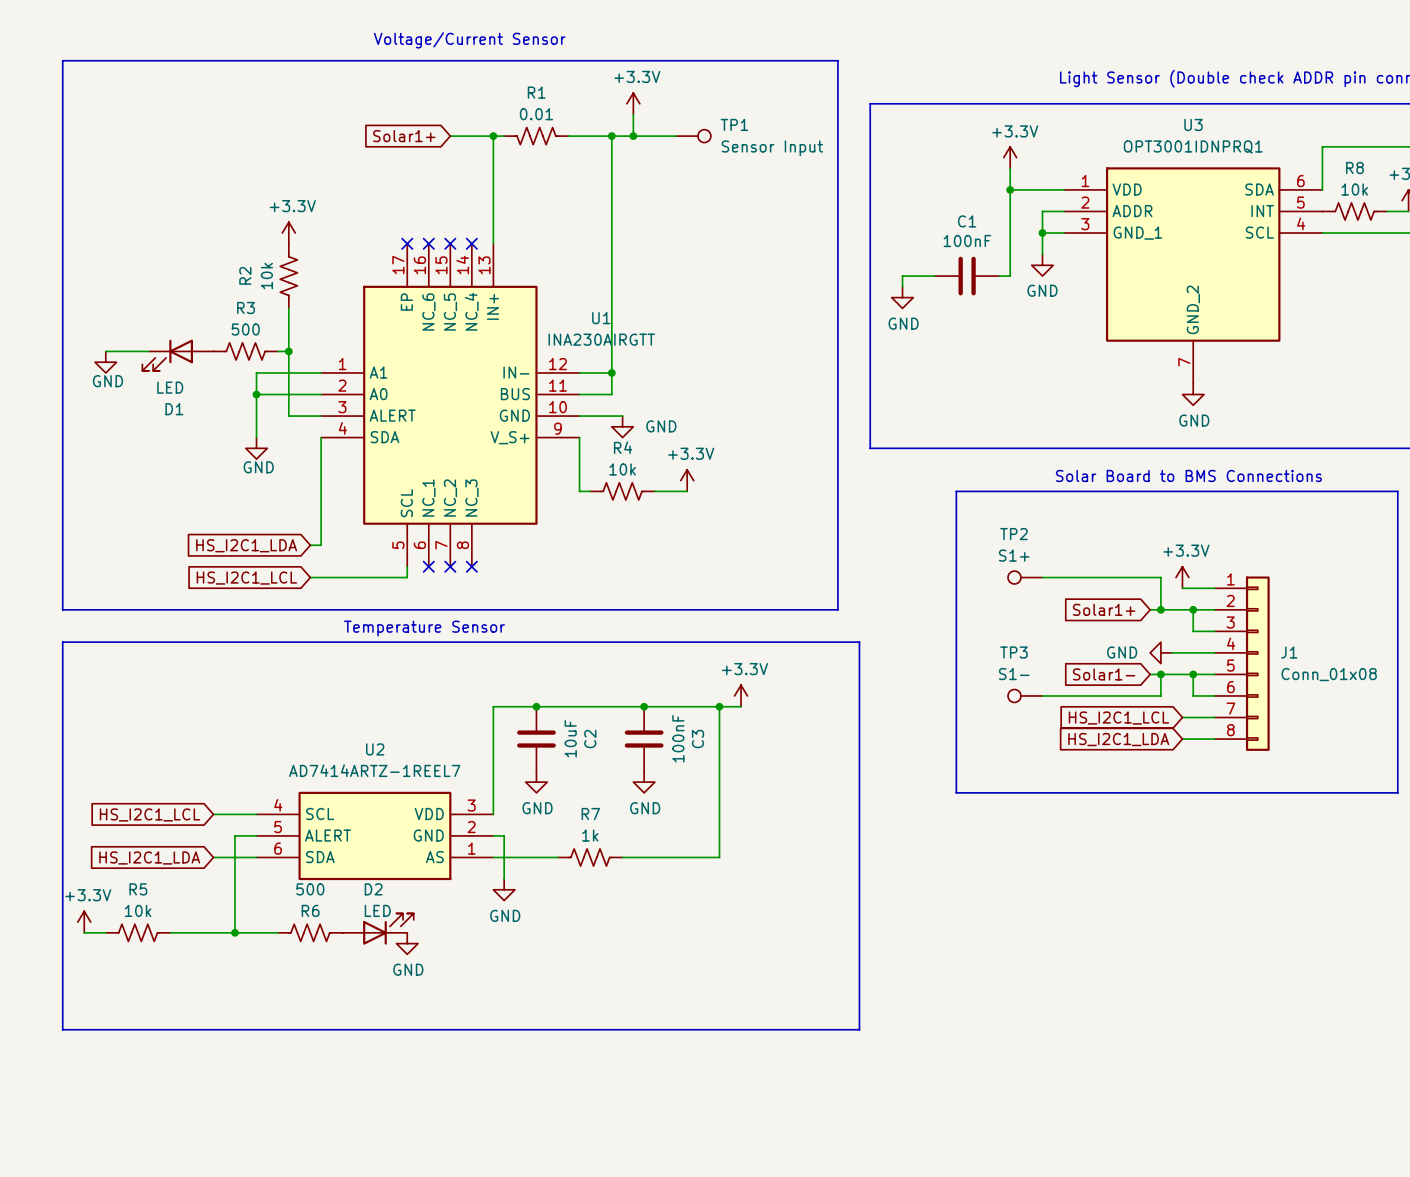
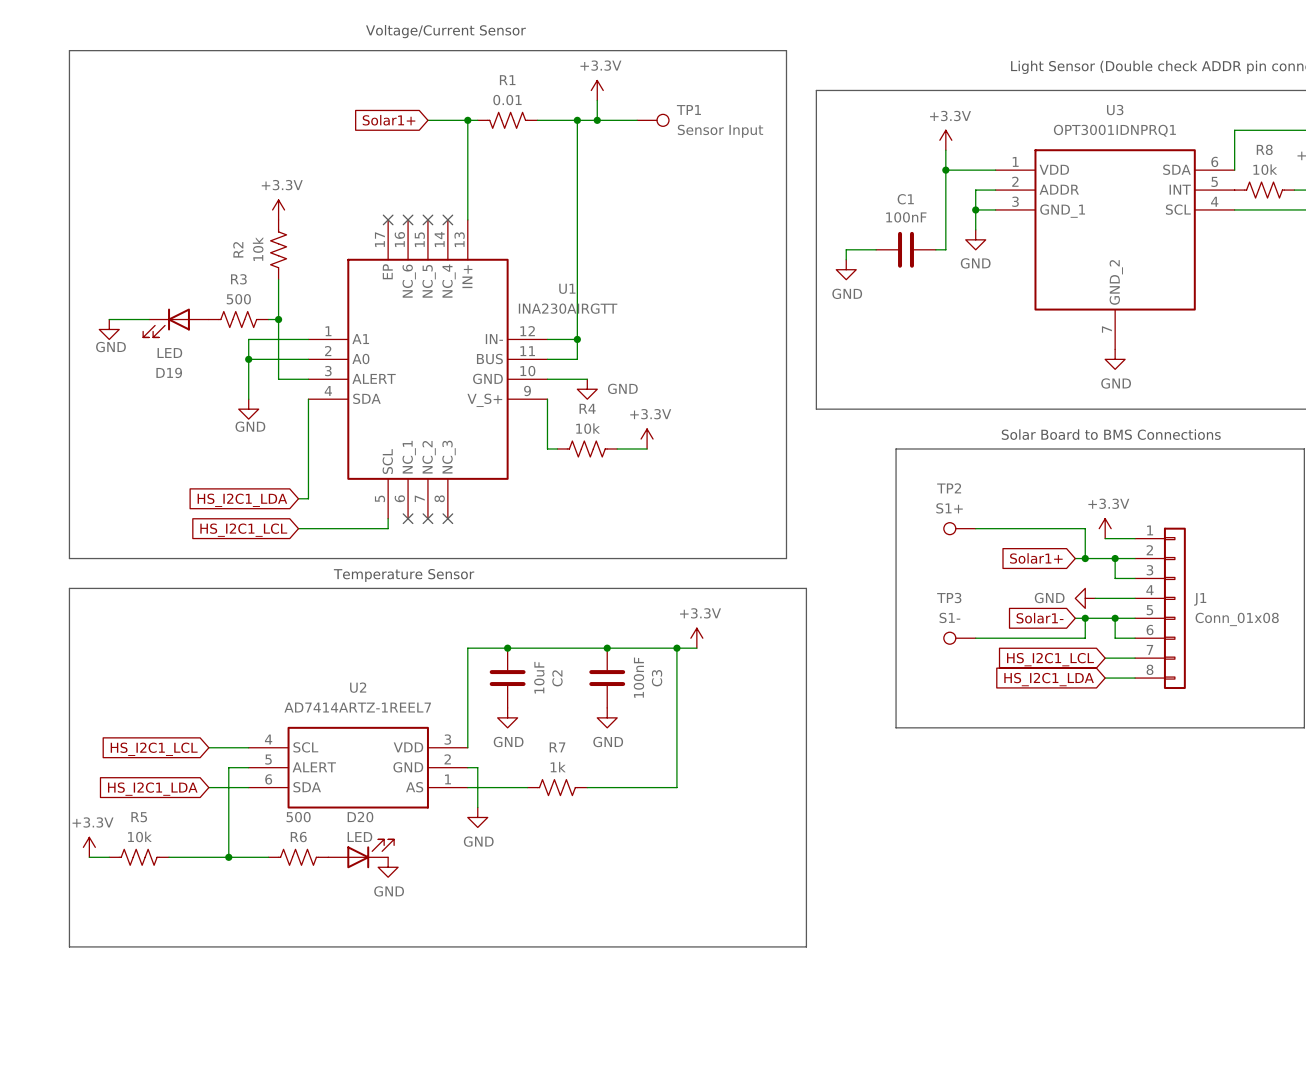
D1 name: D1 (174, 409) -> D19 (169, 372)
D2 name: D2 (373, 889) -> D20 (360, 817)

